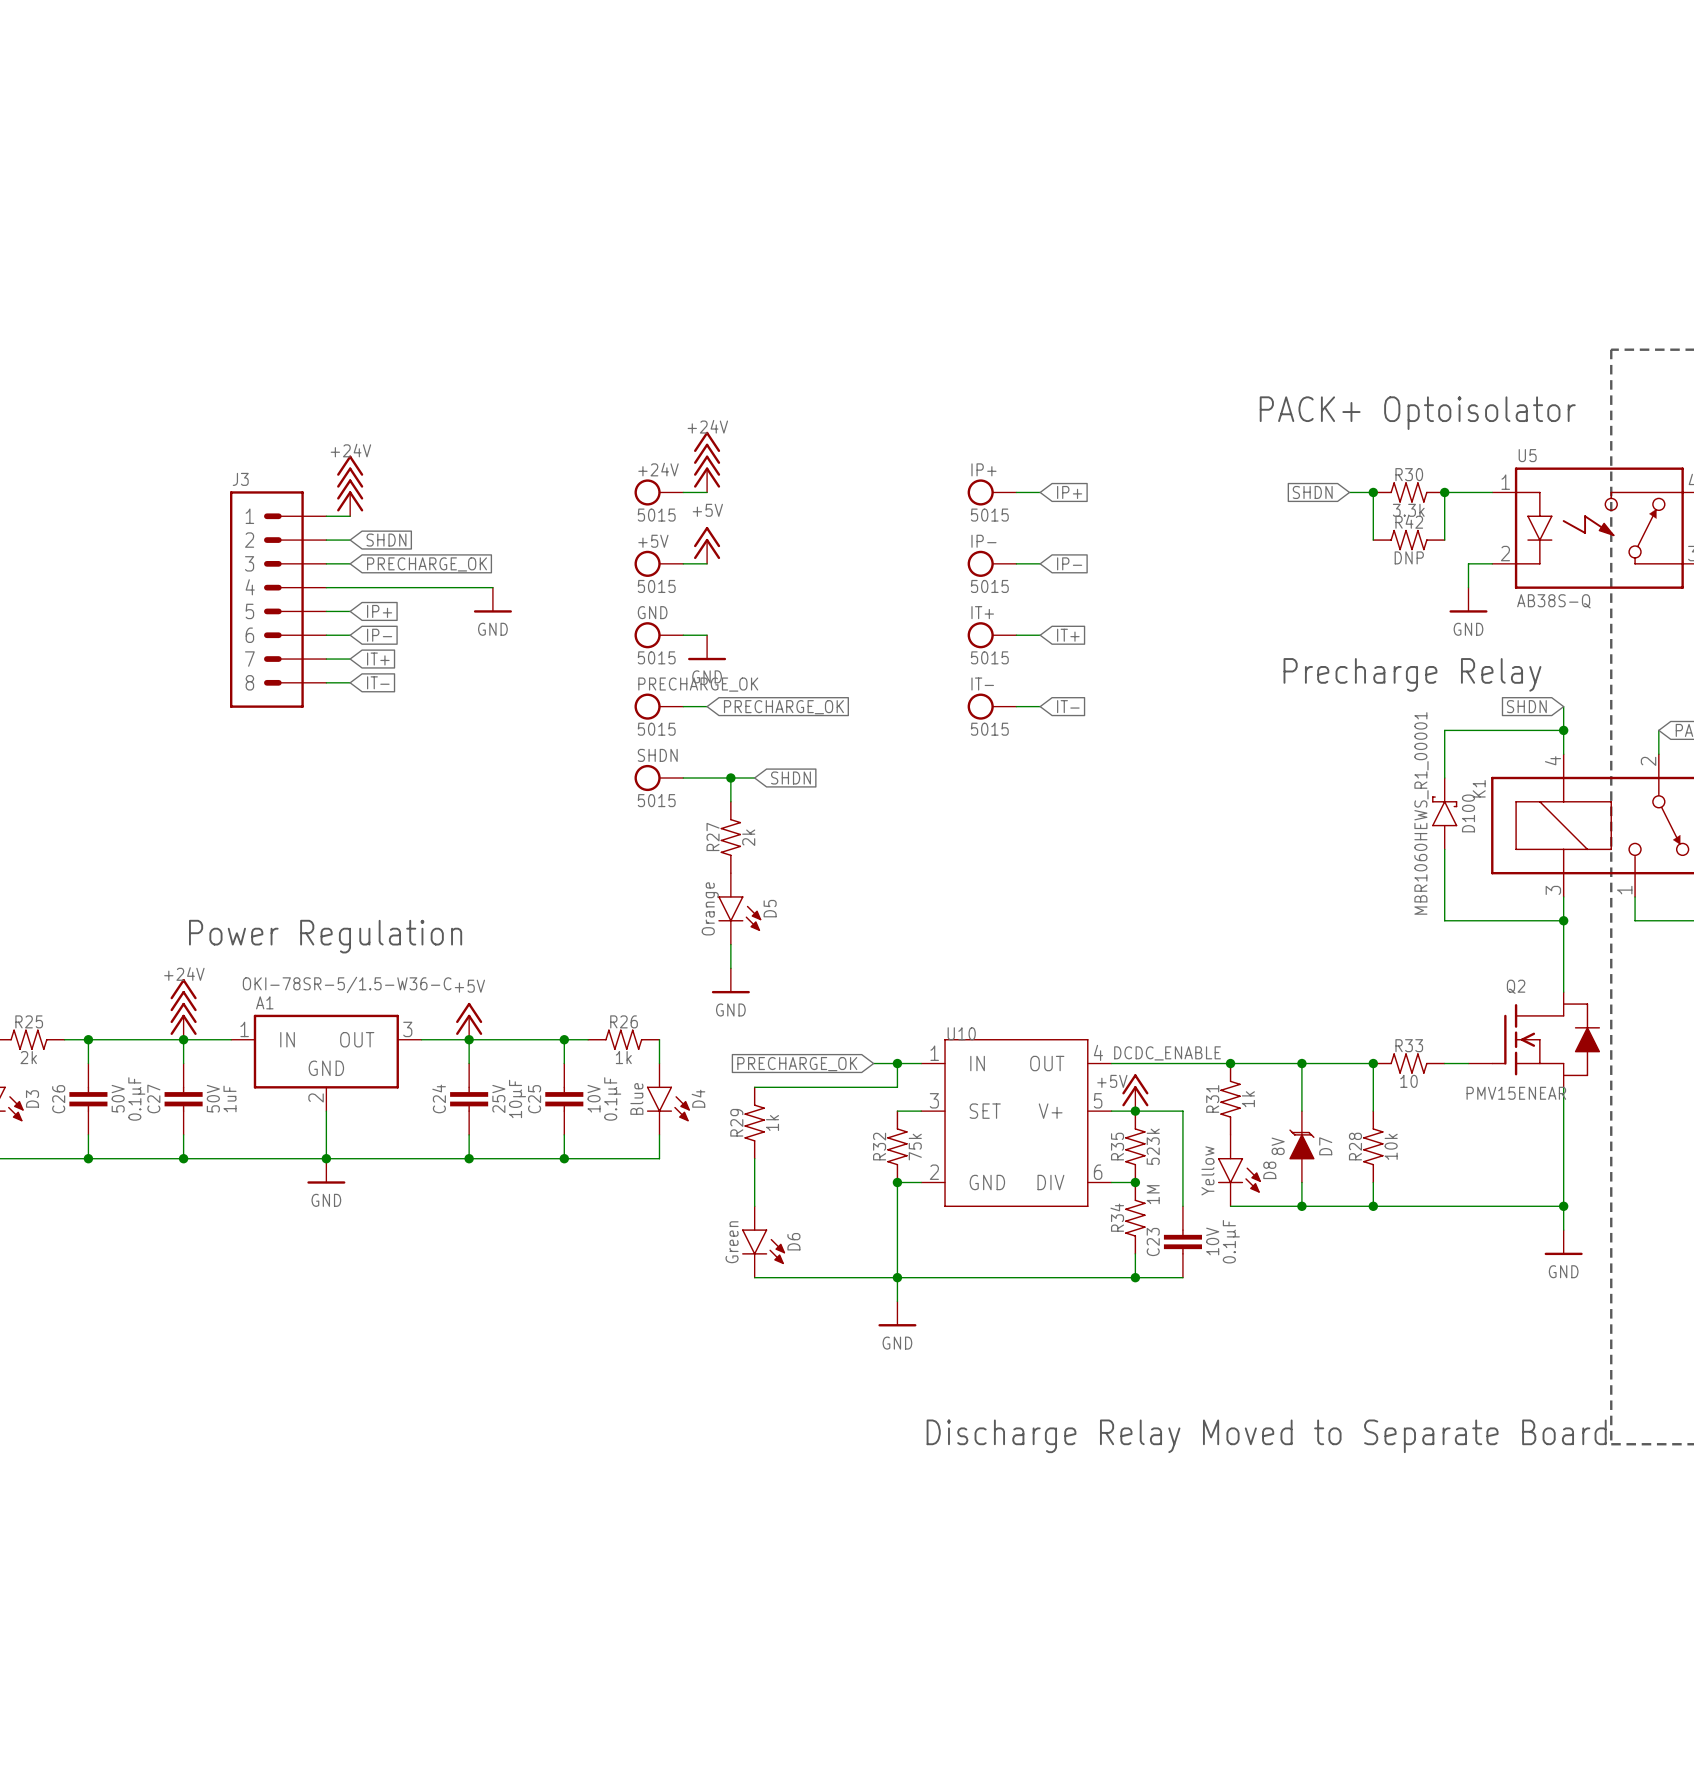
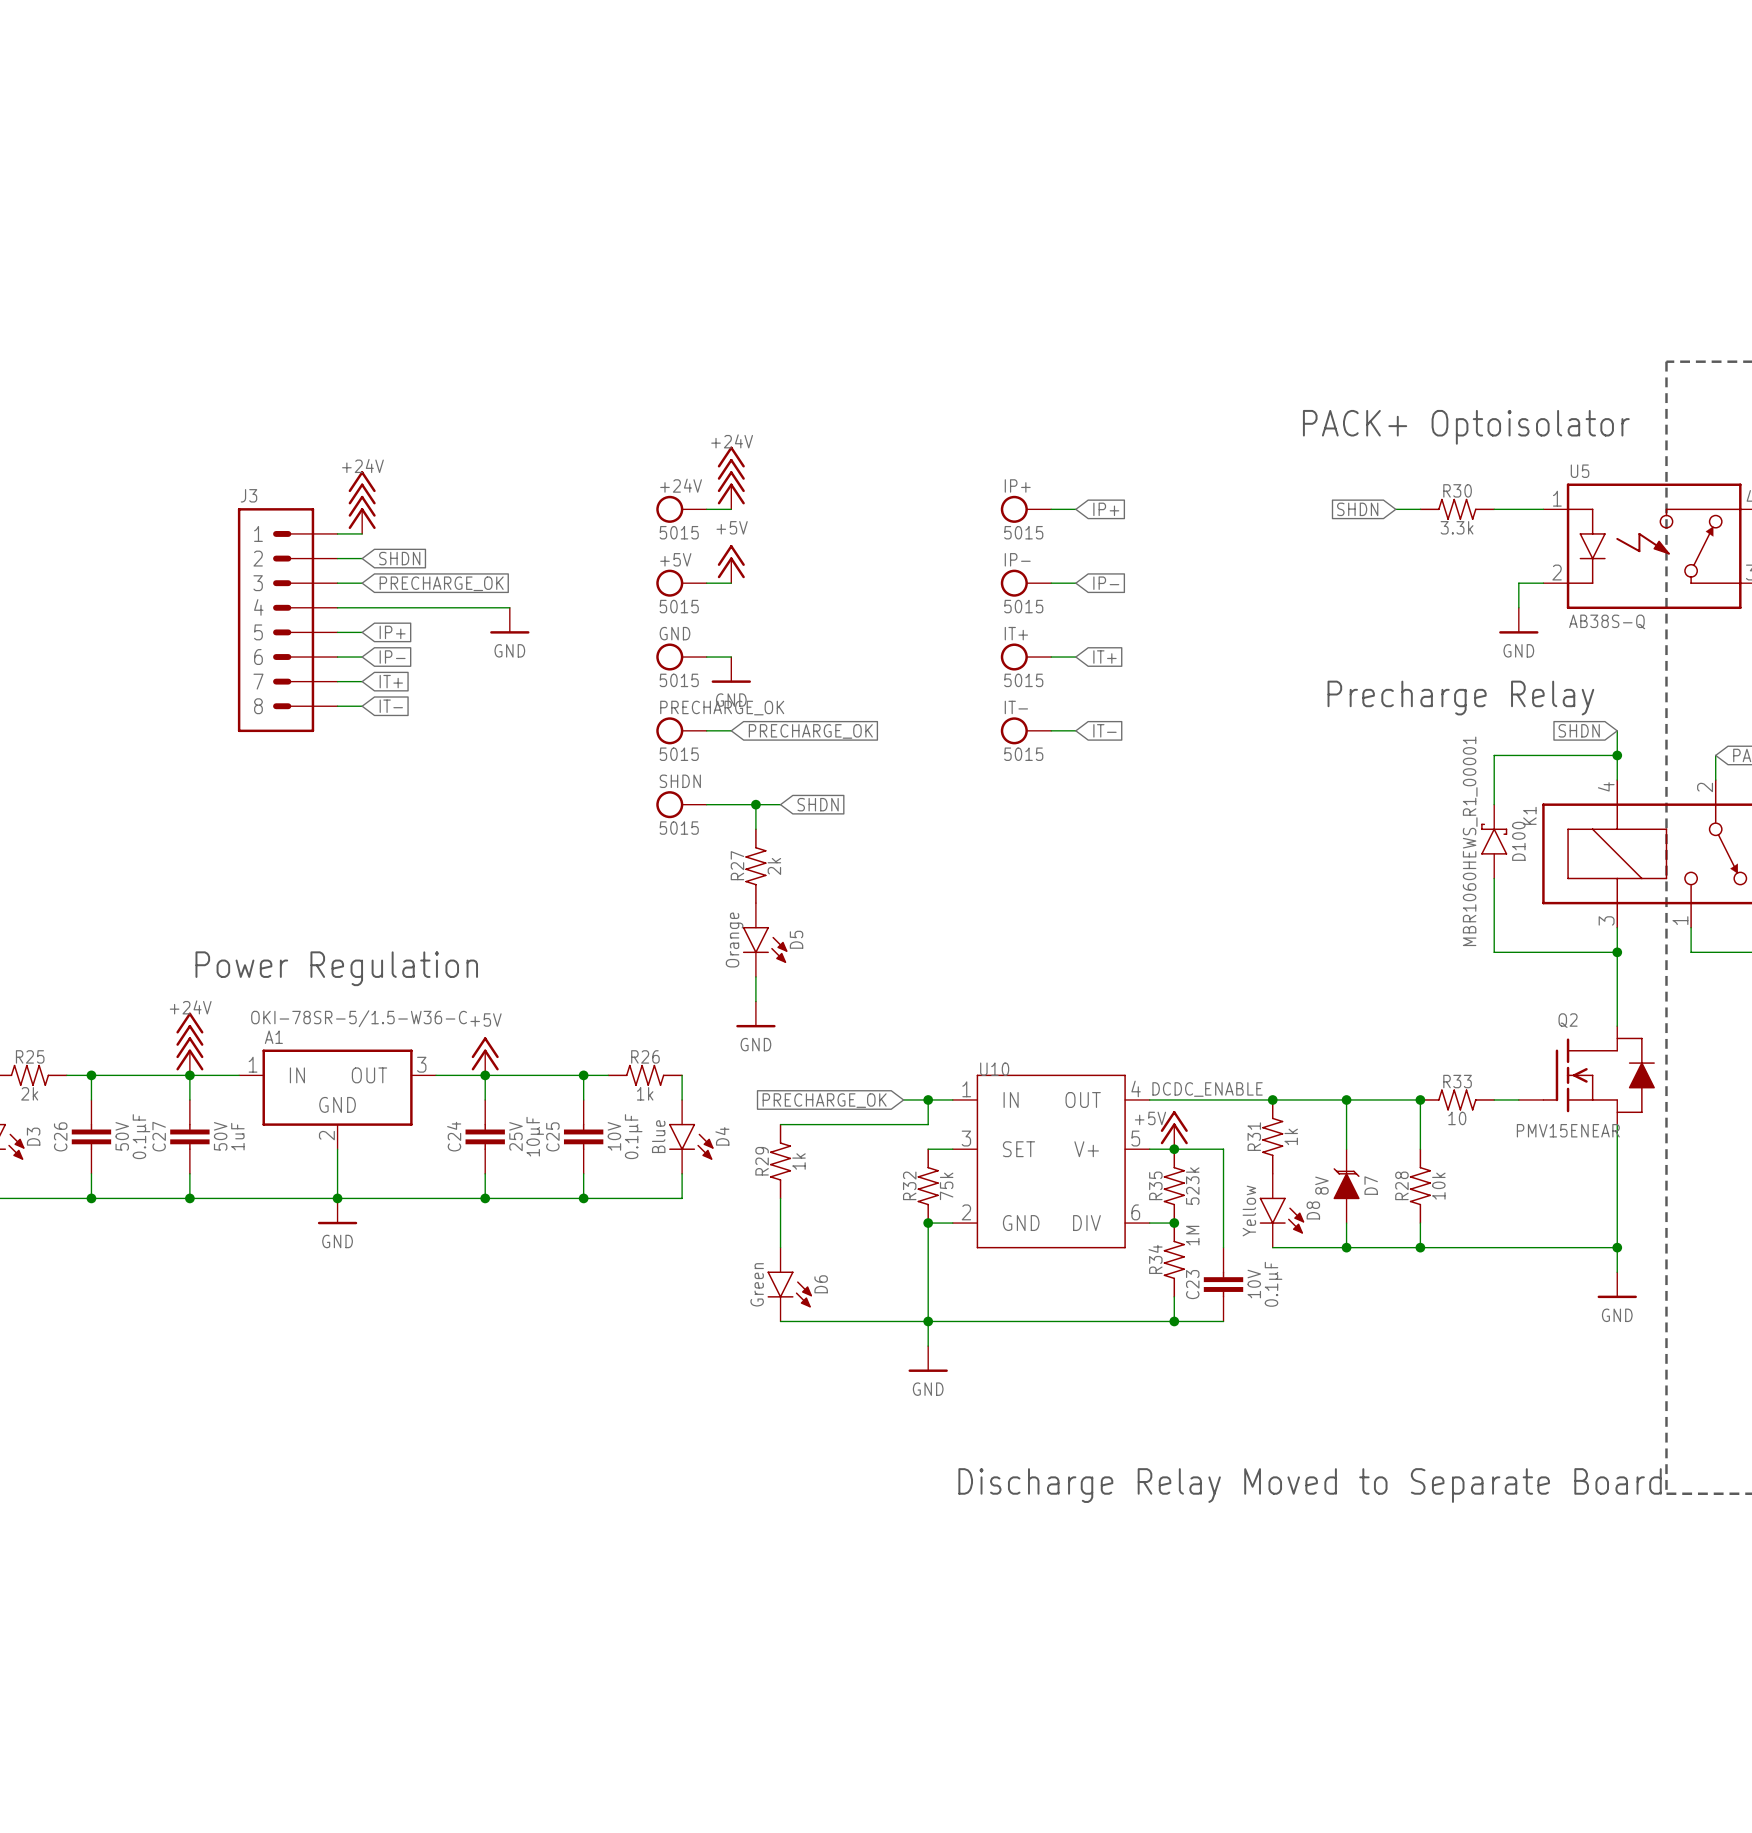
wire: (1373, 492) (1373, 540) -> none
junction: (1373, 492) -> none
wire: (1444, 492) (1444, 540) -> none
junction: (1444, 492) -> none
R42: (1409, 540) -> none

